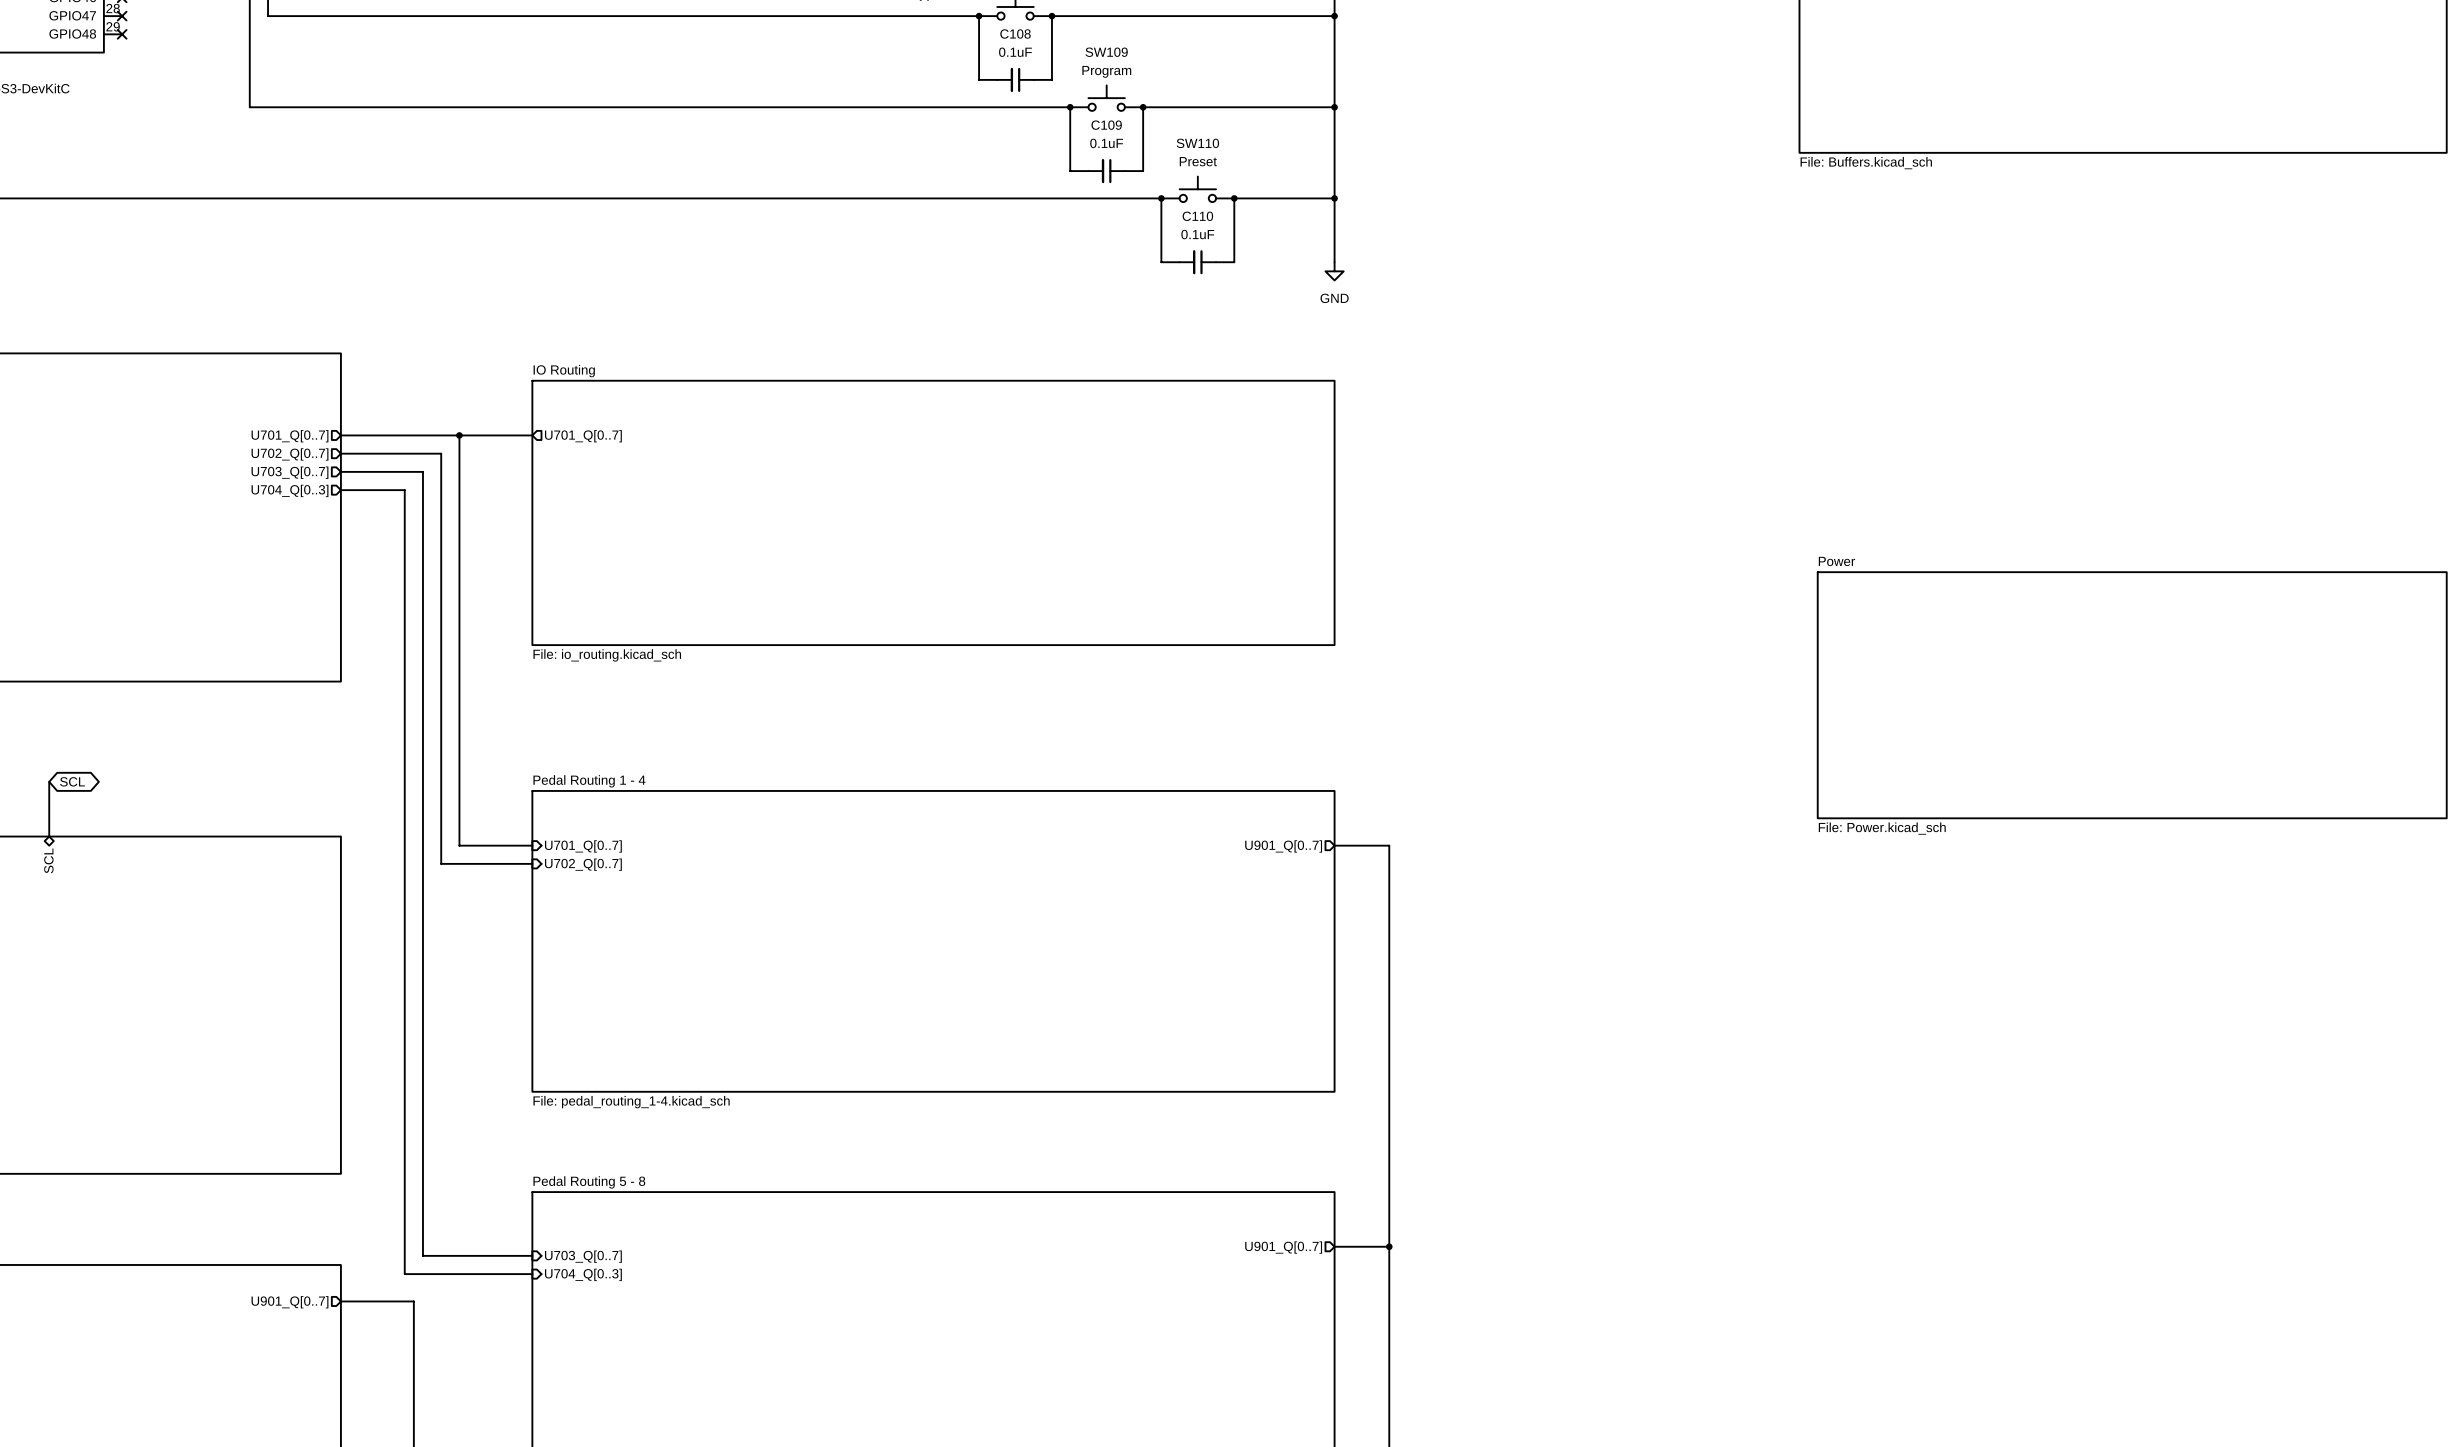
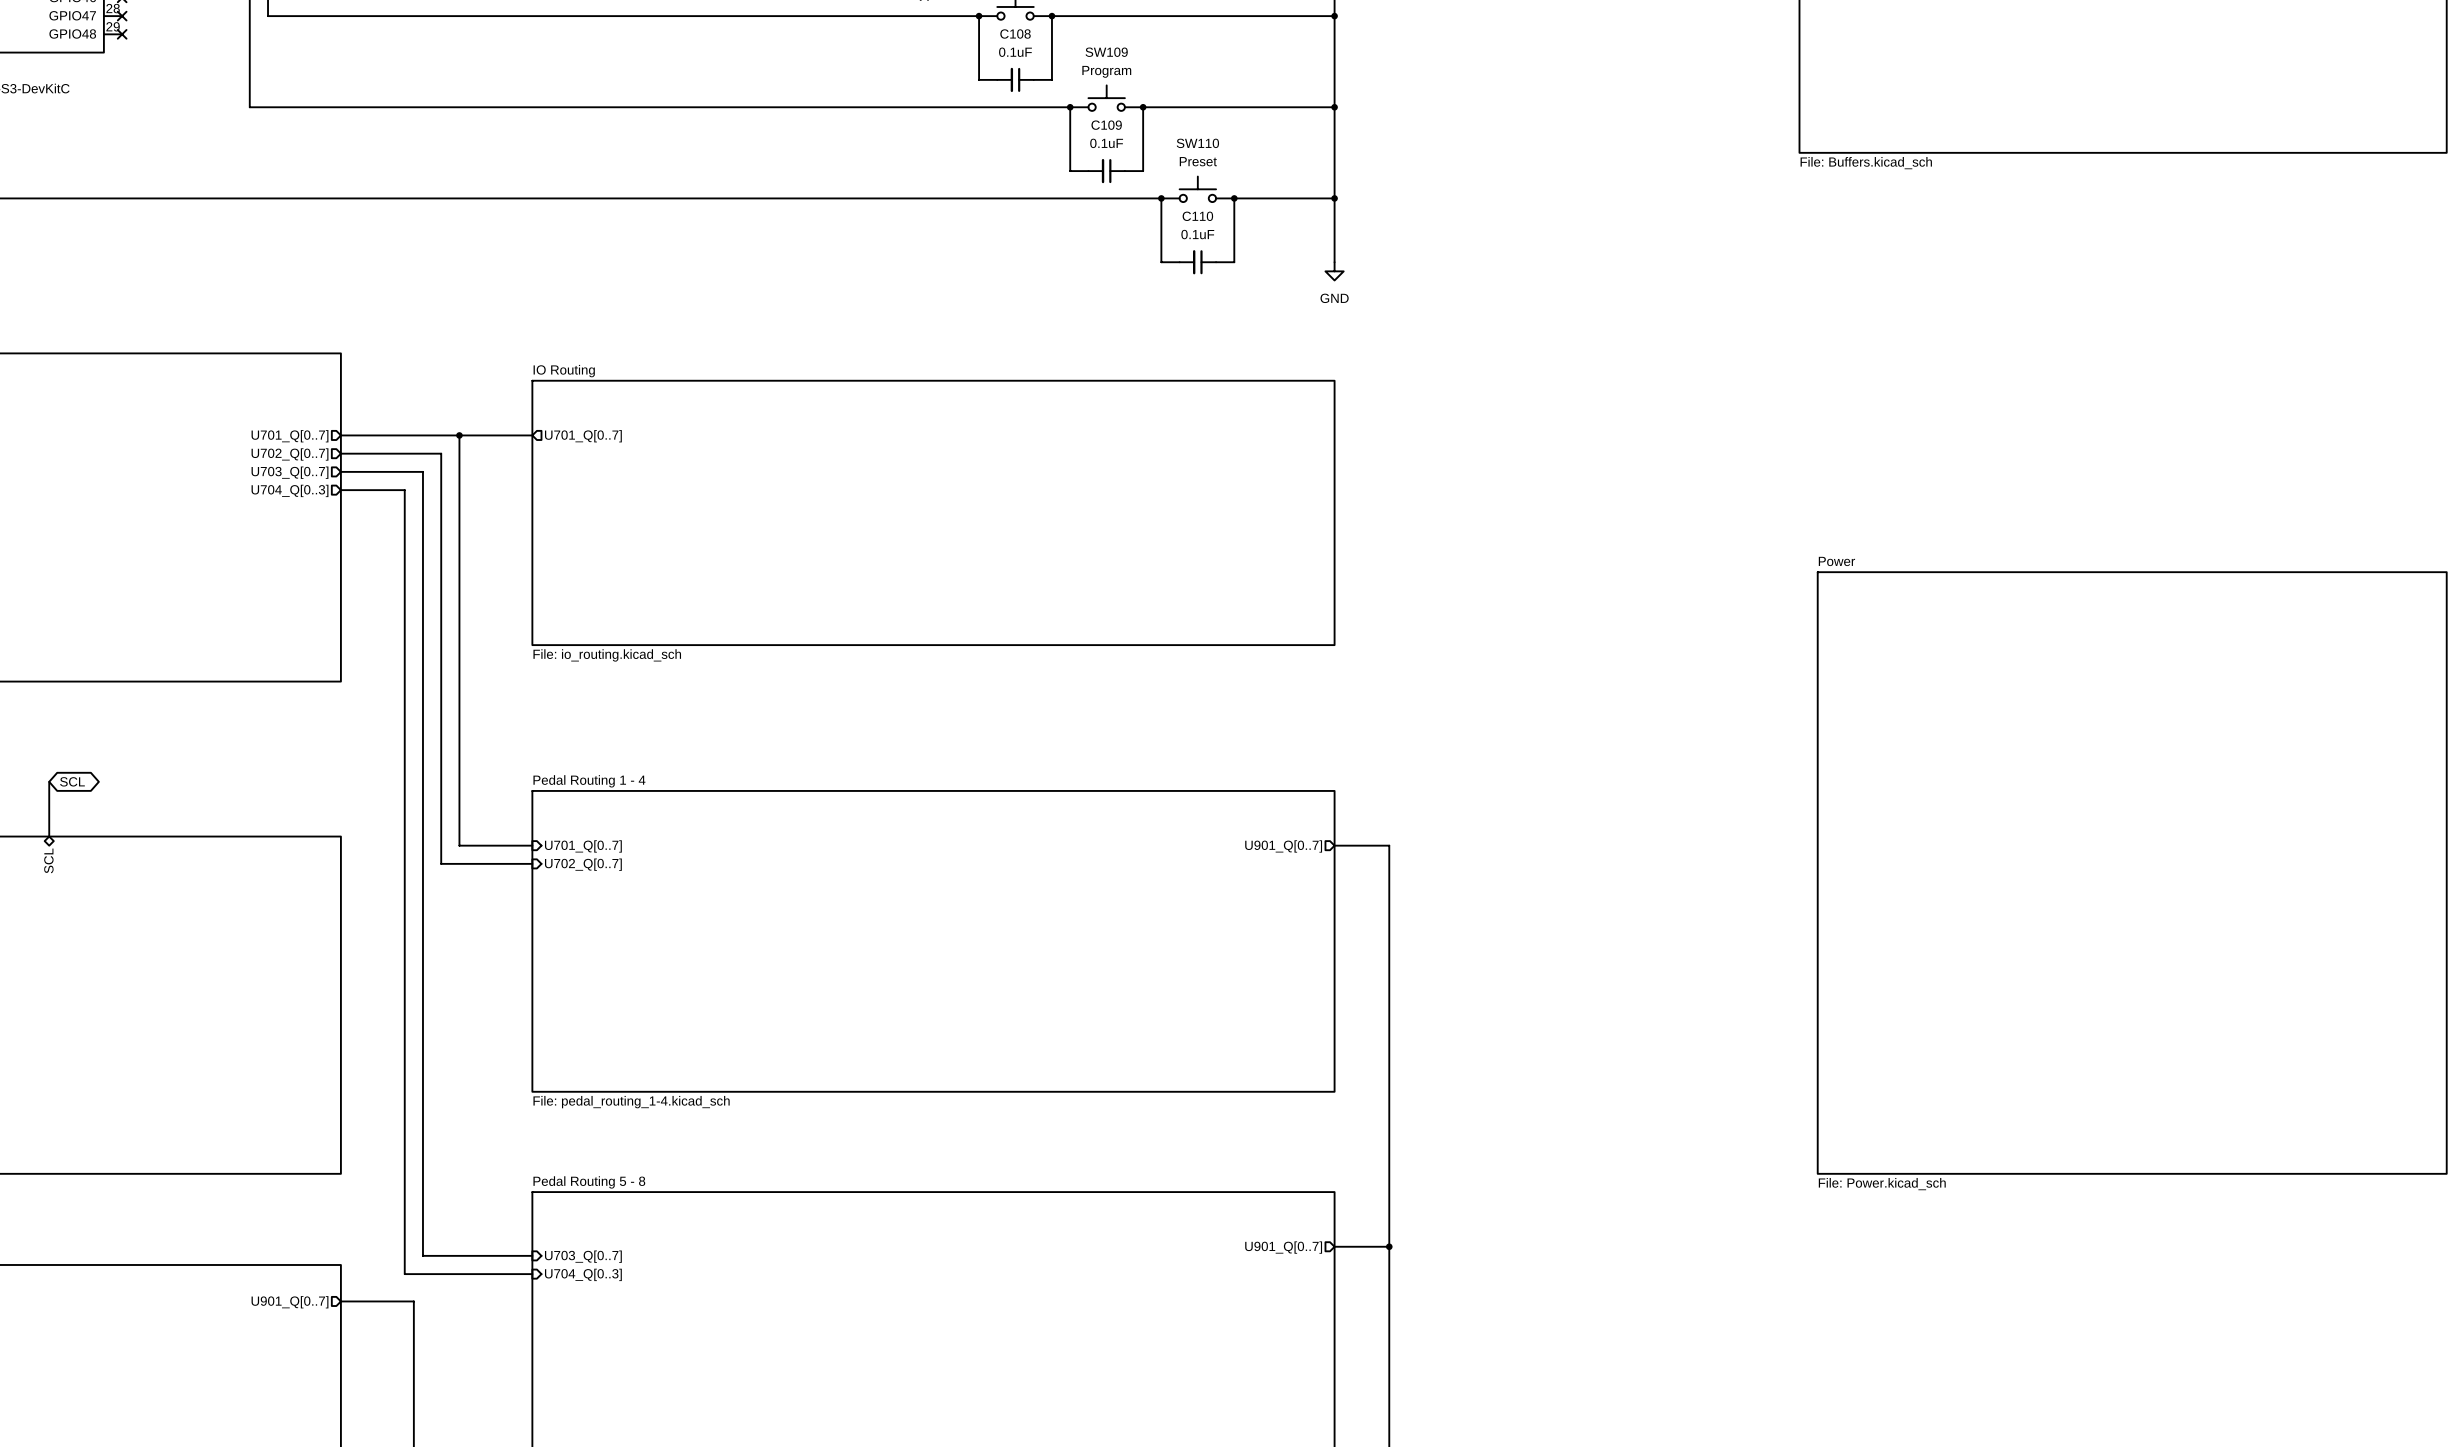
sheet Power: File: Power.kicad_sch (2132, 695) -> none
sheet Power: none -> File: Power.kicad_sch (2132, 873)

